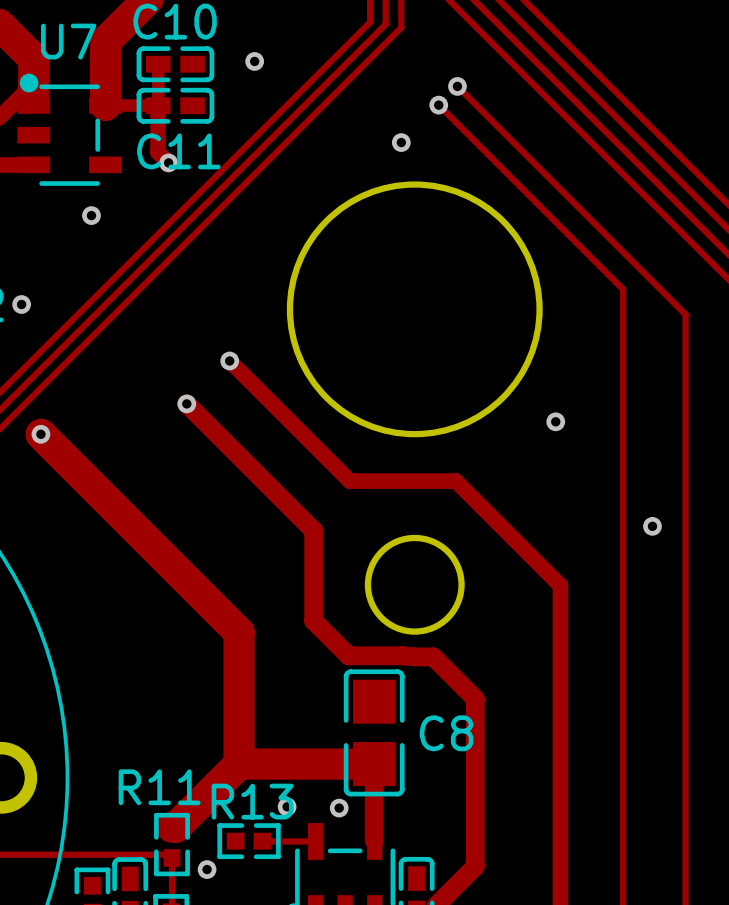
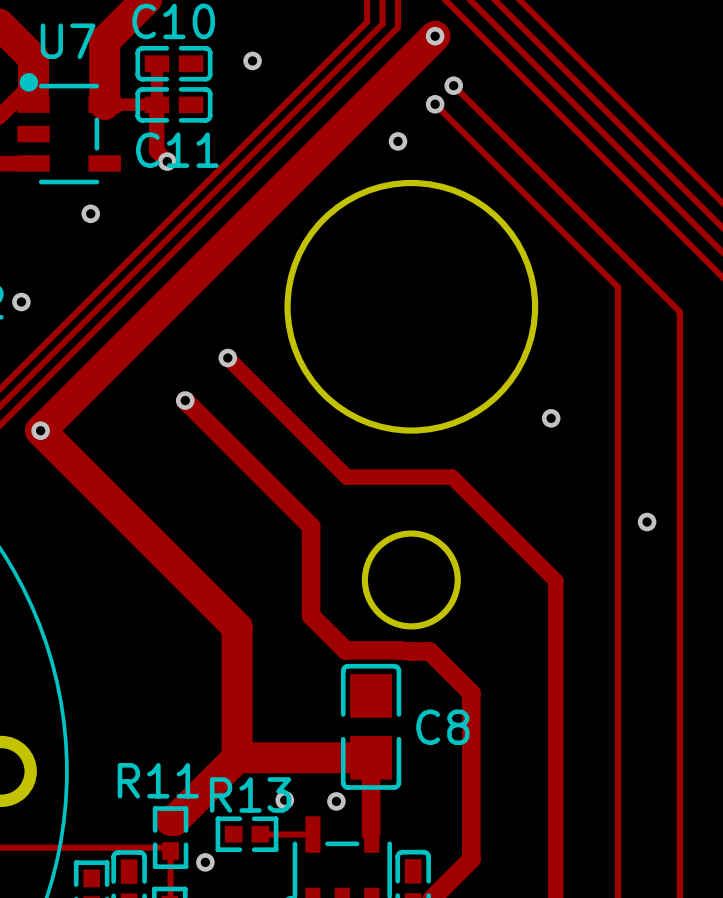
track: none -> (435, 36) (40, 430)
via: none -> (435, 36)

